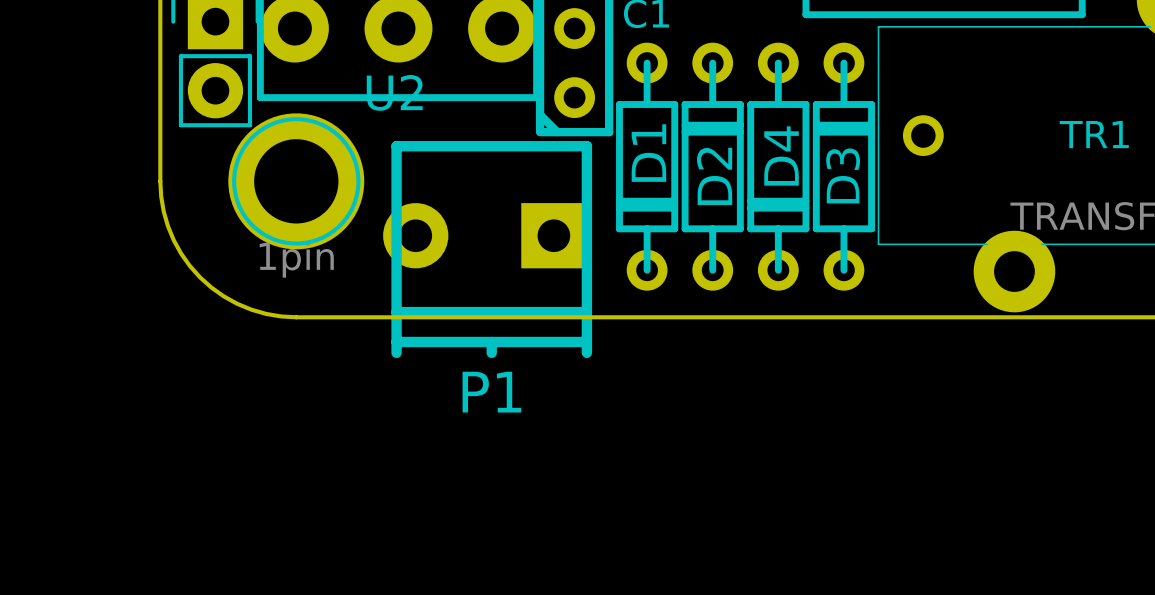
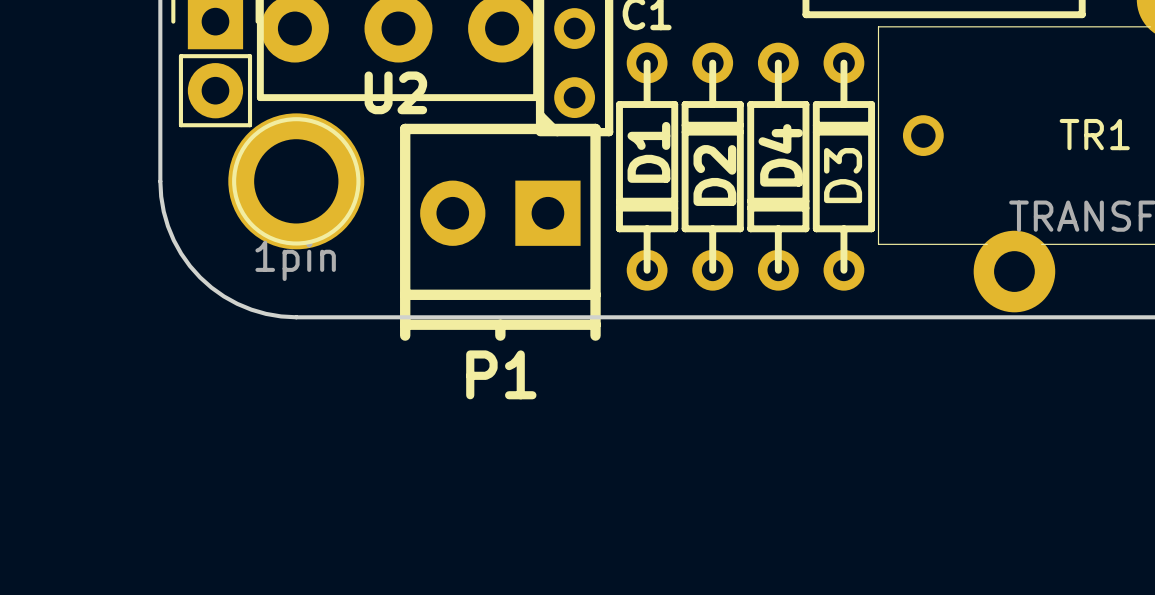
P1 footprint: [383, 141, 593, 359] -> [400, 123, 601, 341]

